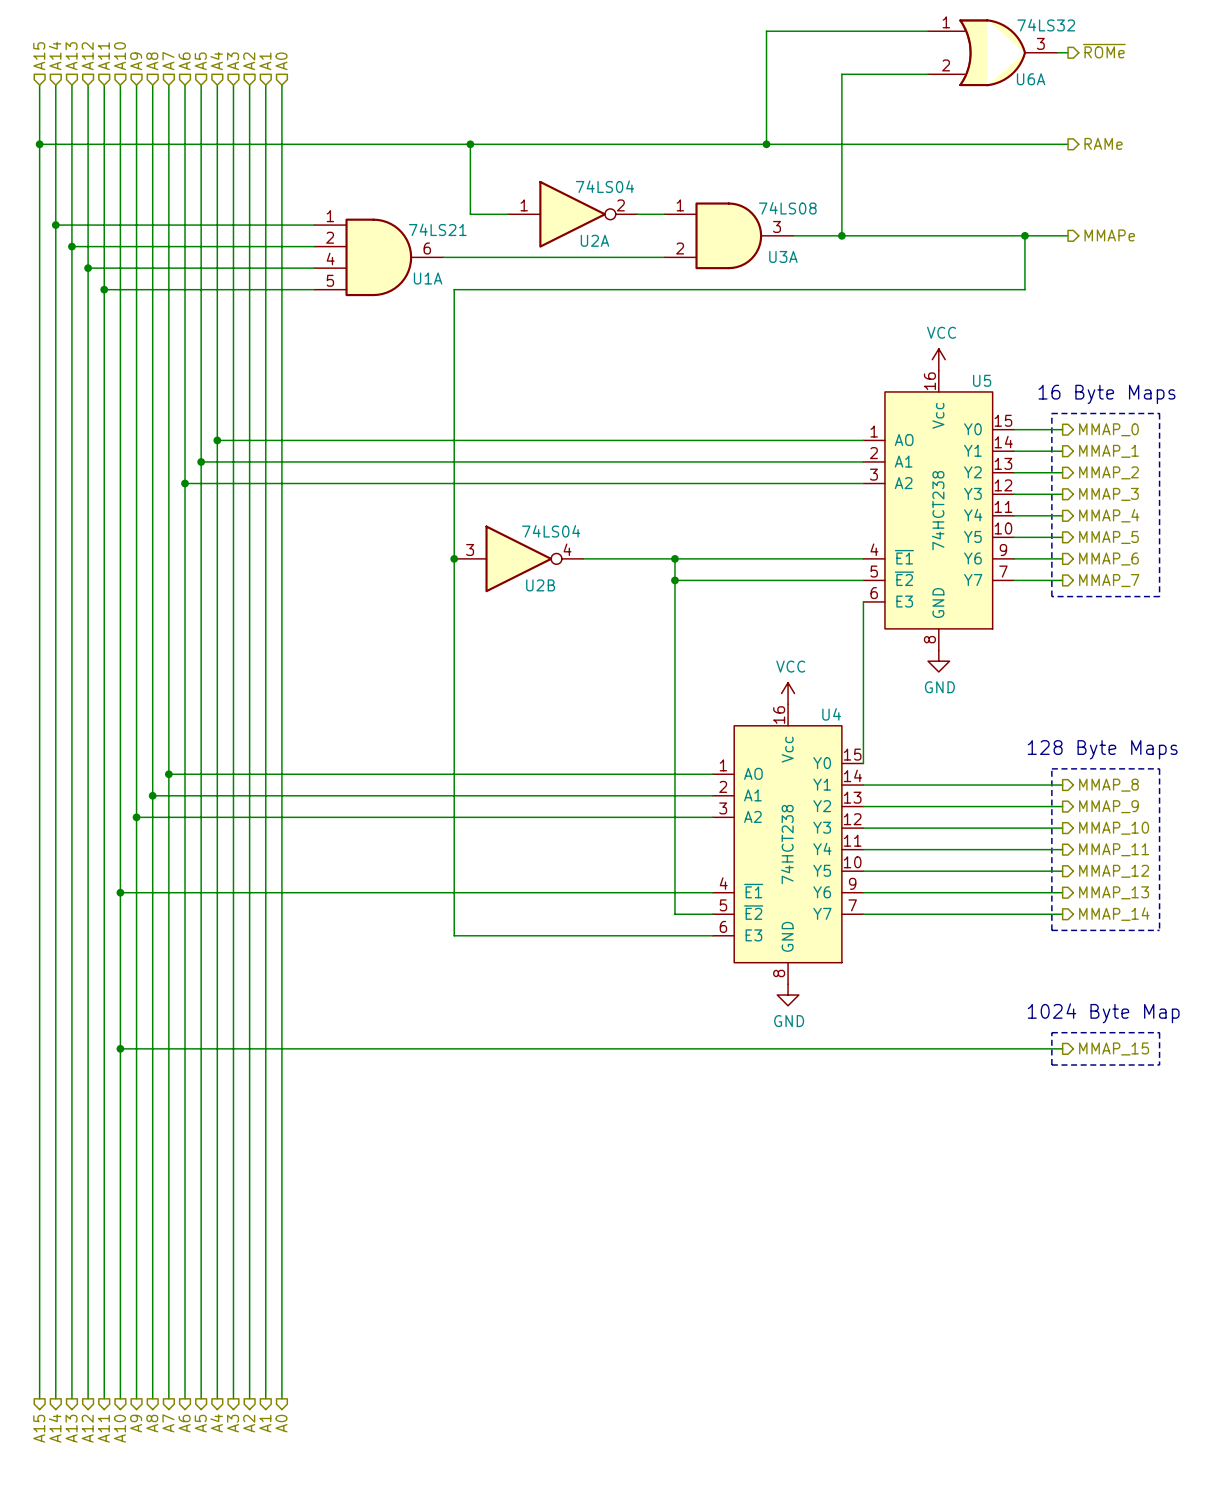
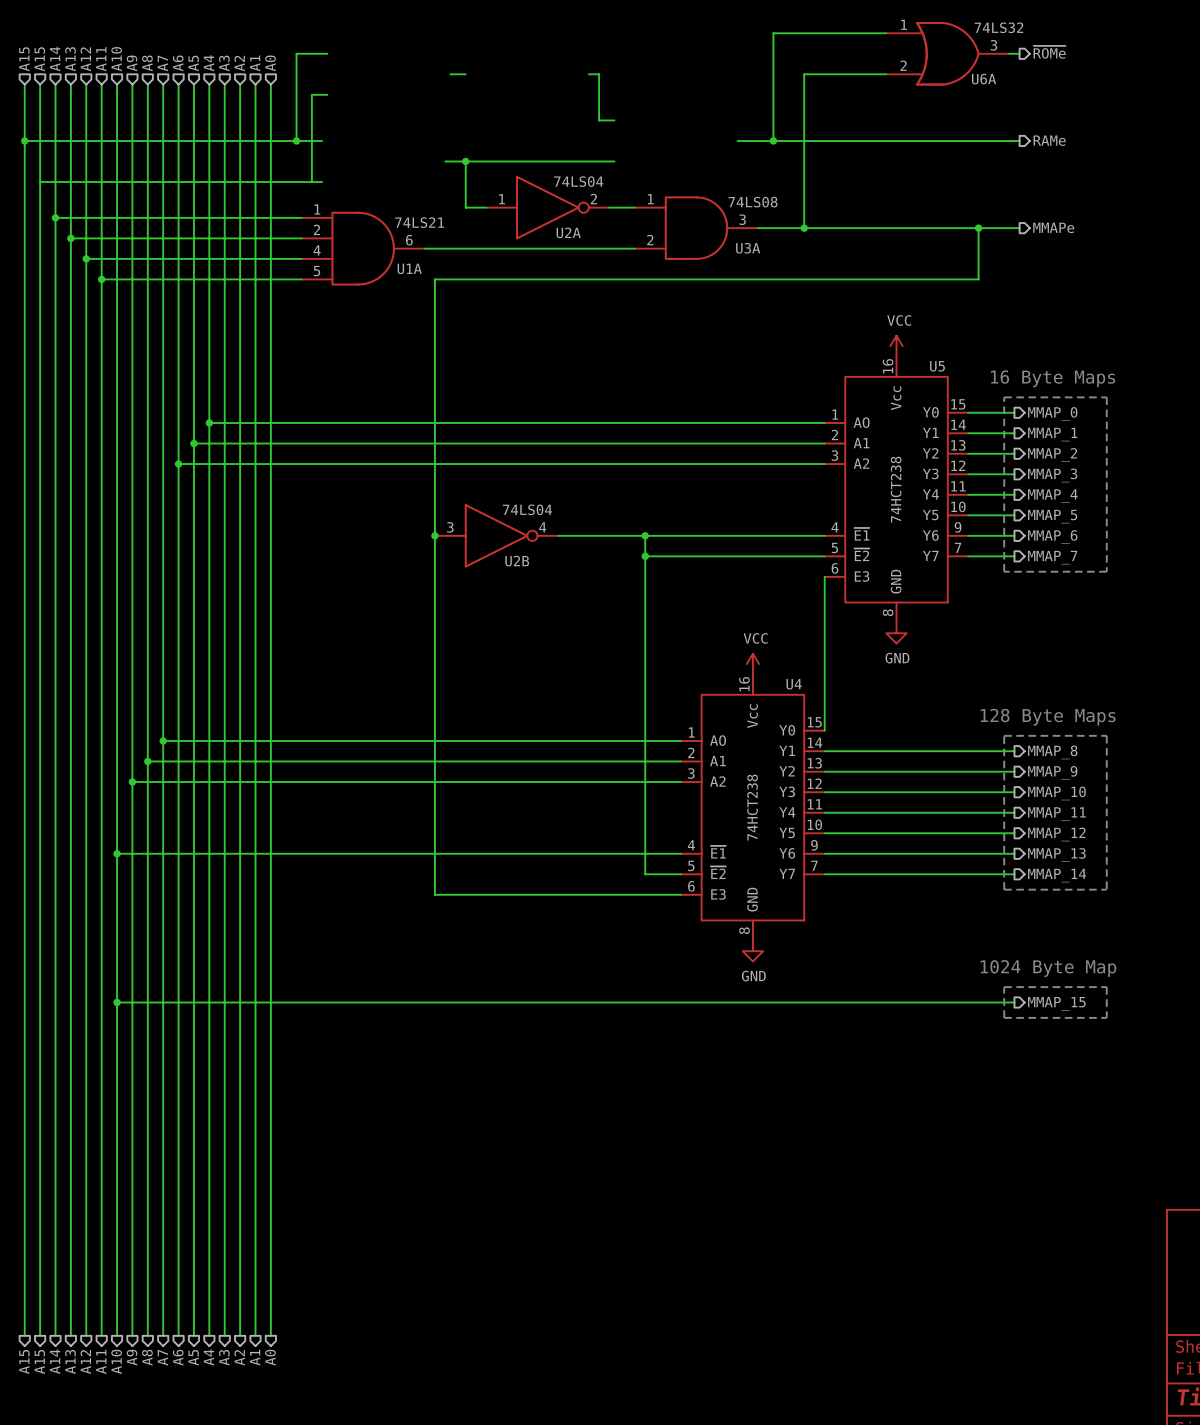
wire: (809, 31) (766, 31) (766, 144) -> (773, 33) (773, 140)
wire: none -> (327, 53) (296, 53) (296, 140)
hierarchical label: none -> A15 (24, 59)
wire: none -> (450, 74) (465, 74)
wire: none -> (588, 74) (599, 74) (599, 120) (614, 120)
wire: none -> (24, 84) (24, 1335)
wire: none -> (327, 94) (311, 94) (311, 181)
wire: none -> (24, 140) (40, 140)
junction position: (39, 144) -> (24, 140)
junction: none -> (296, 140)
wire: (335, 144) (771, 144) -> none
wire: (470, 144) (470, 214) (486, 214) -> (465, 161) (465, 207)
junction position: (470, 144) -> (465, 161)
junction position: (766, 144) -> (773, 140)
wire: none -> (445, 161) (614, 161)
wire: none -> (40, 181) (322, 181)
hierarchical label: none -> A15 (24, 1361)

